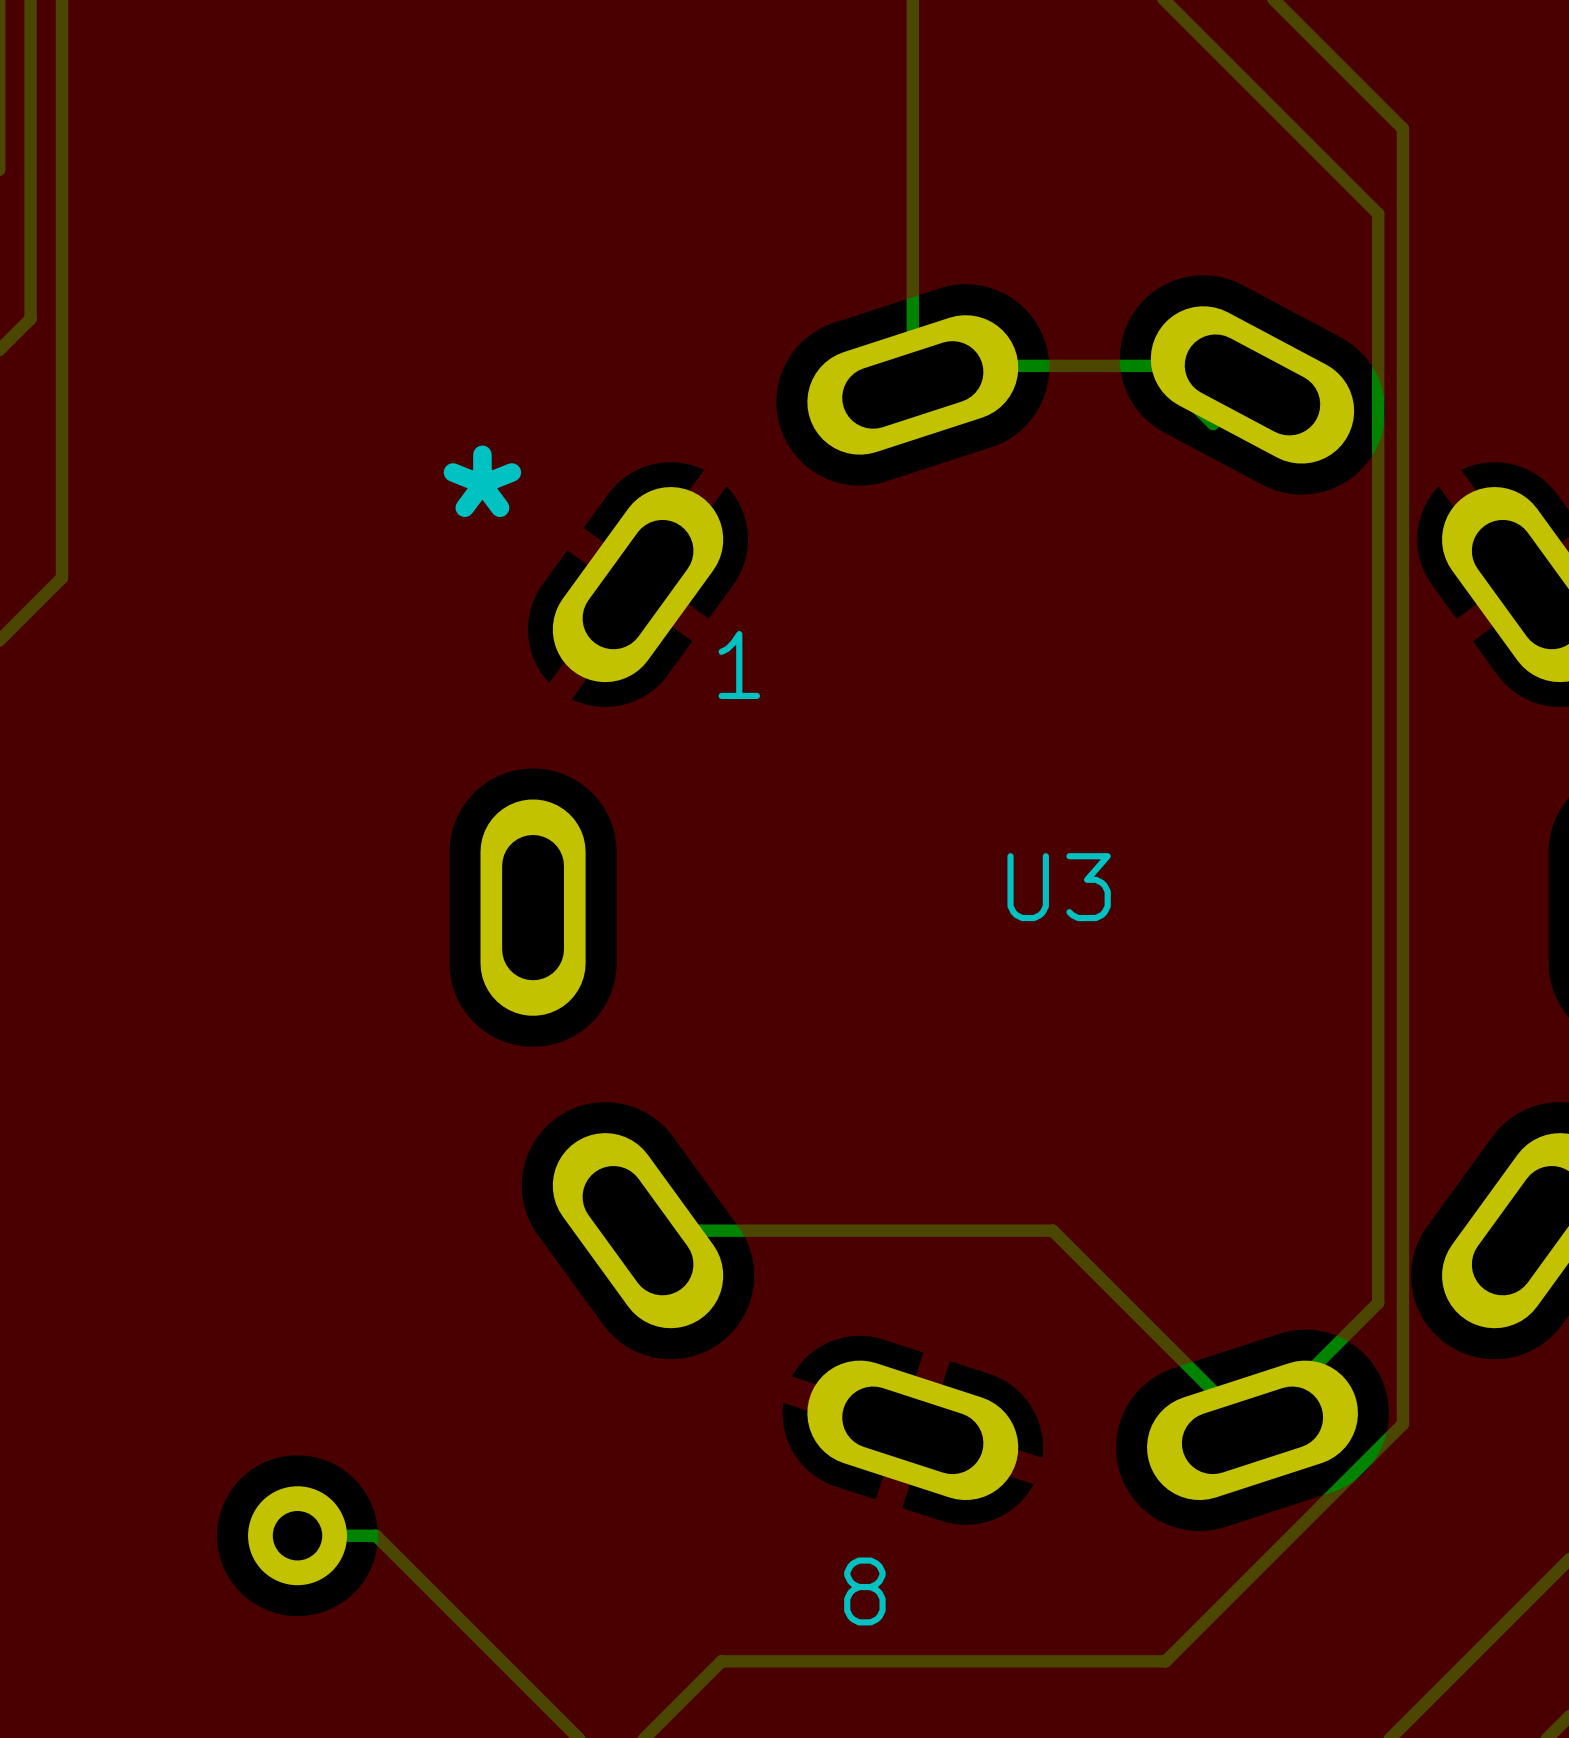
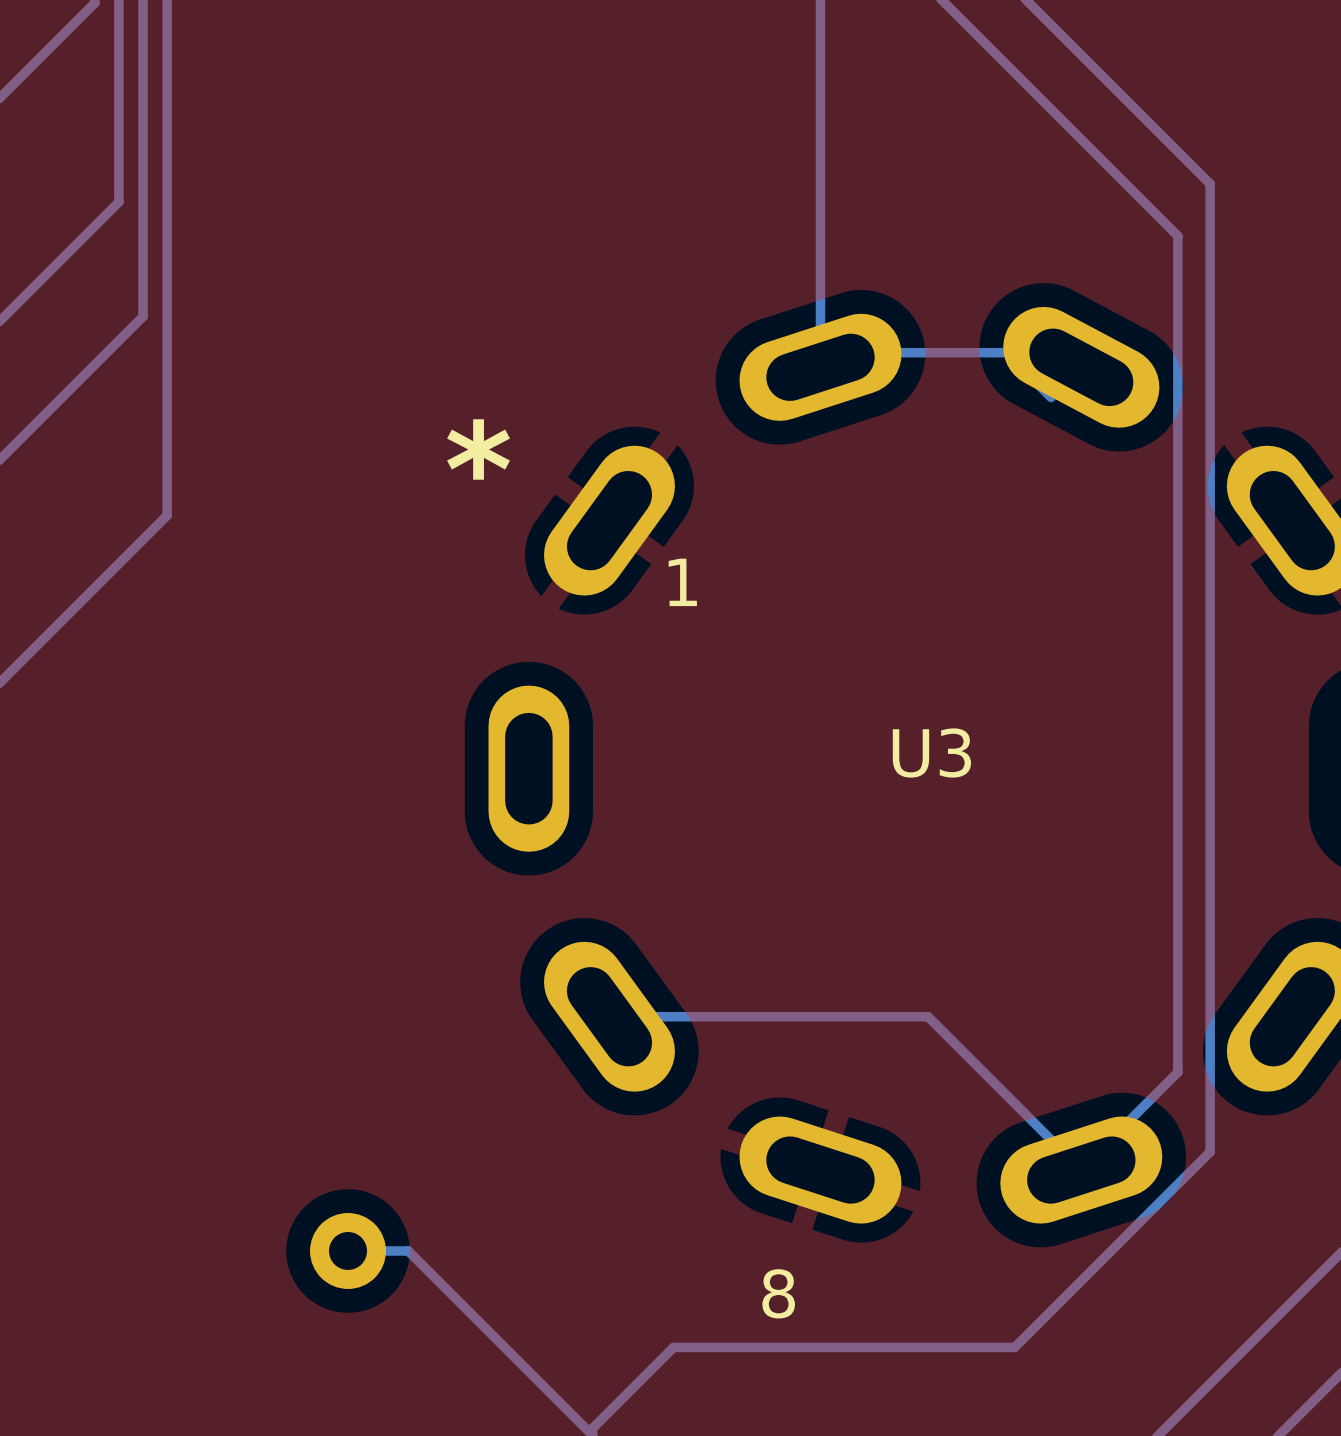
bottom track: (1402, 128) (1402, 1424) -> (1196, 170) (1210, 183) (1210, 1151) (1196, 1165)

